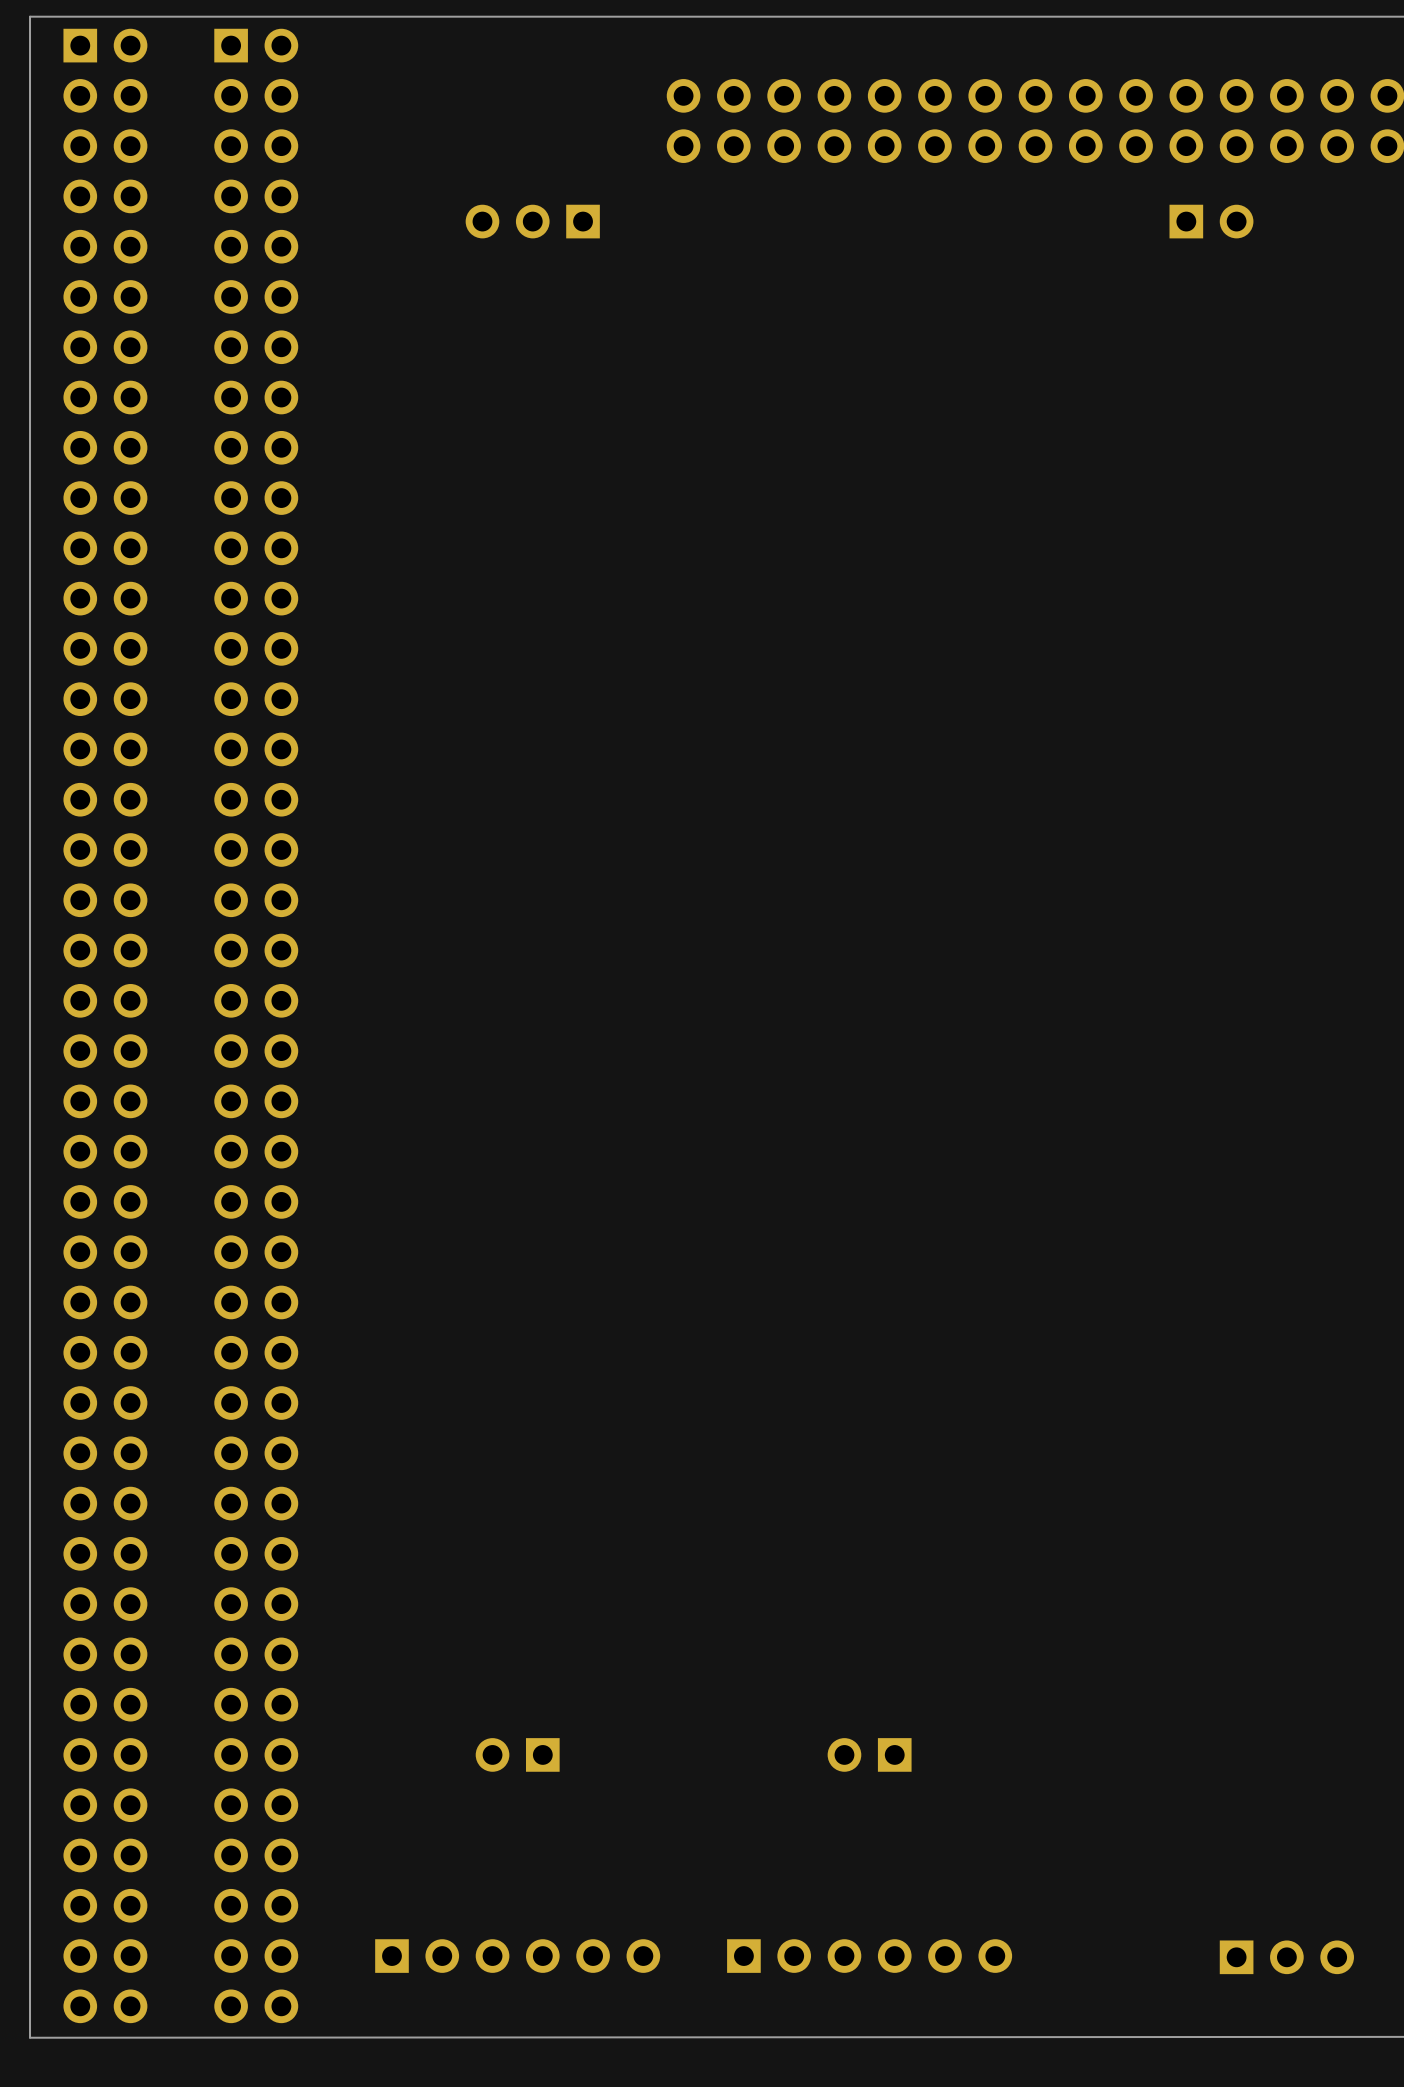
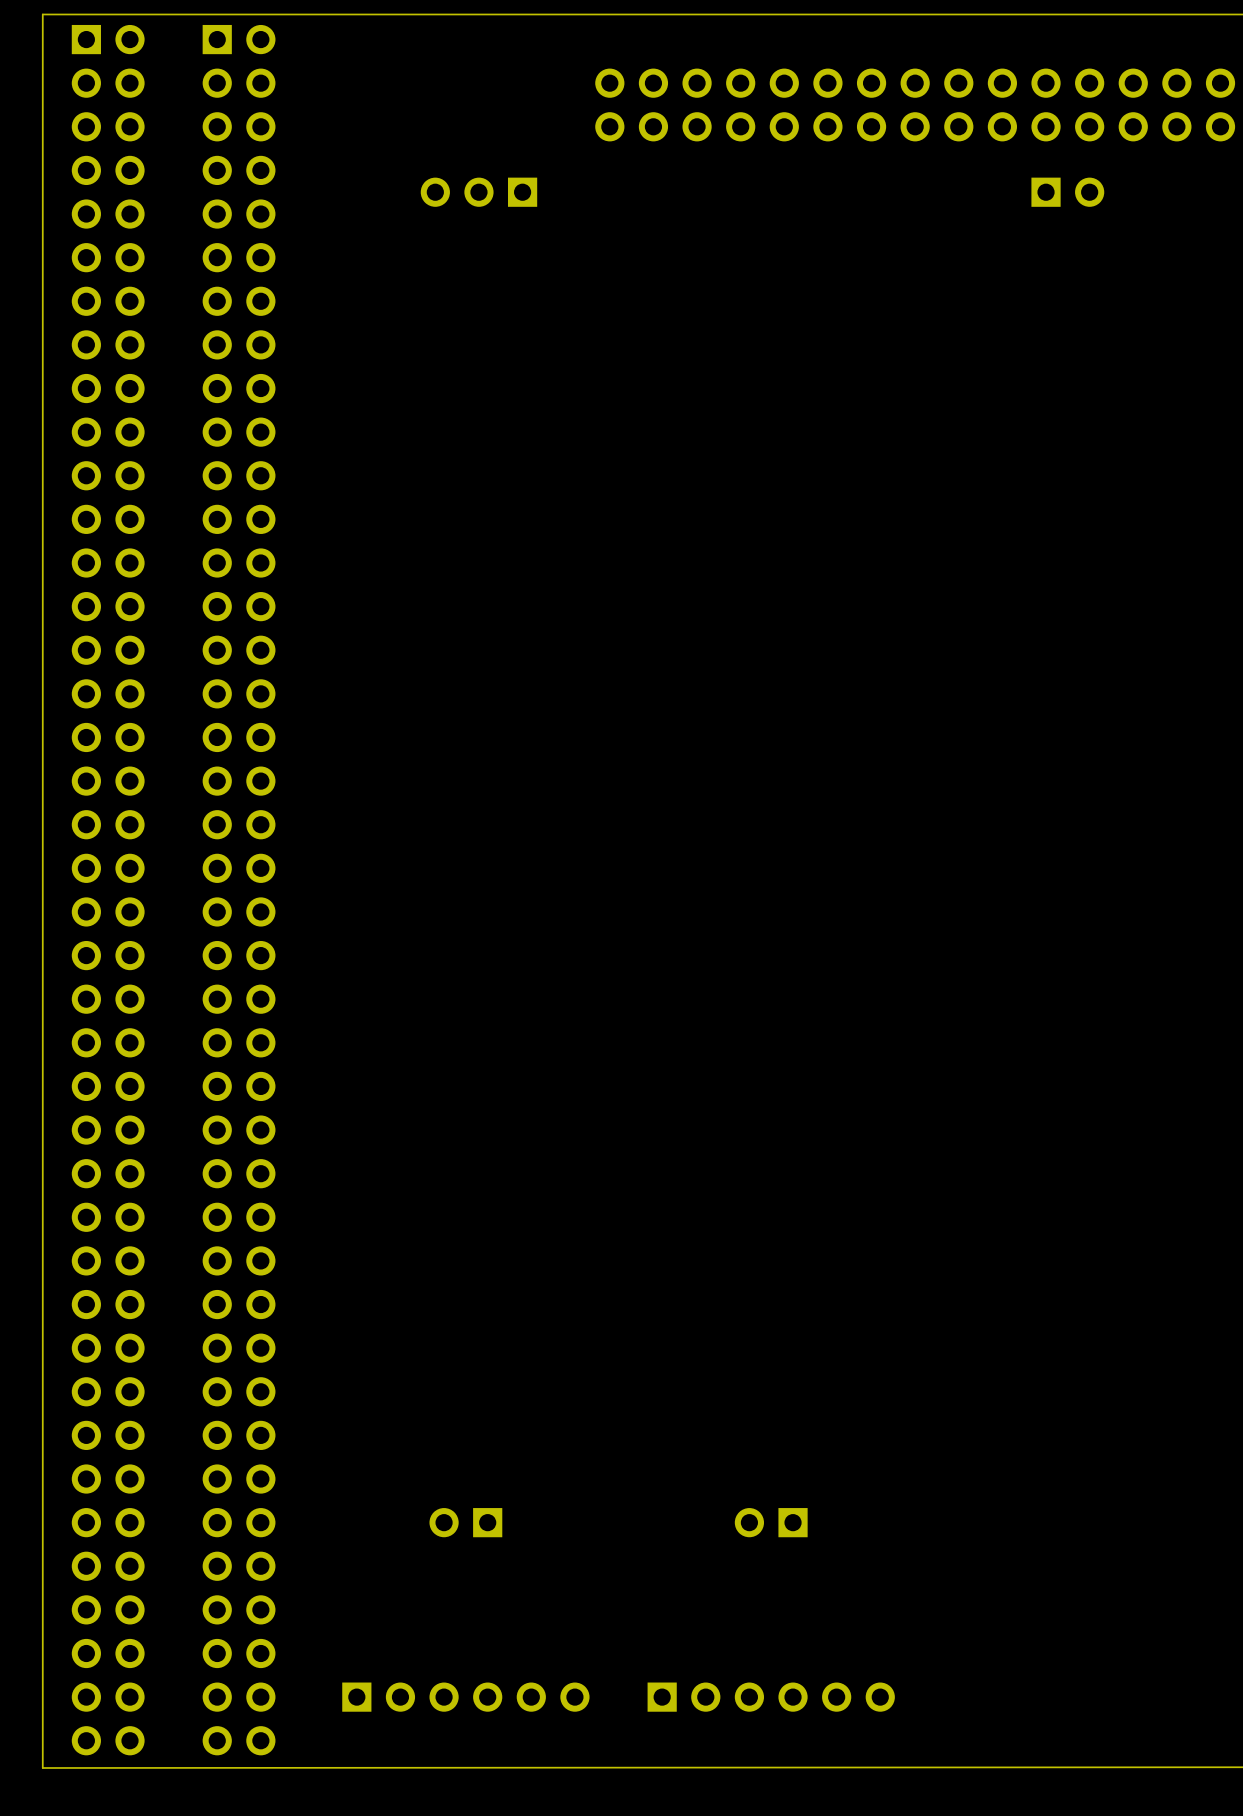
part: (1286, 1957) -> none

